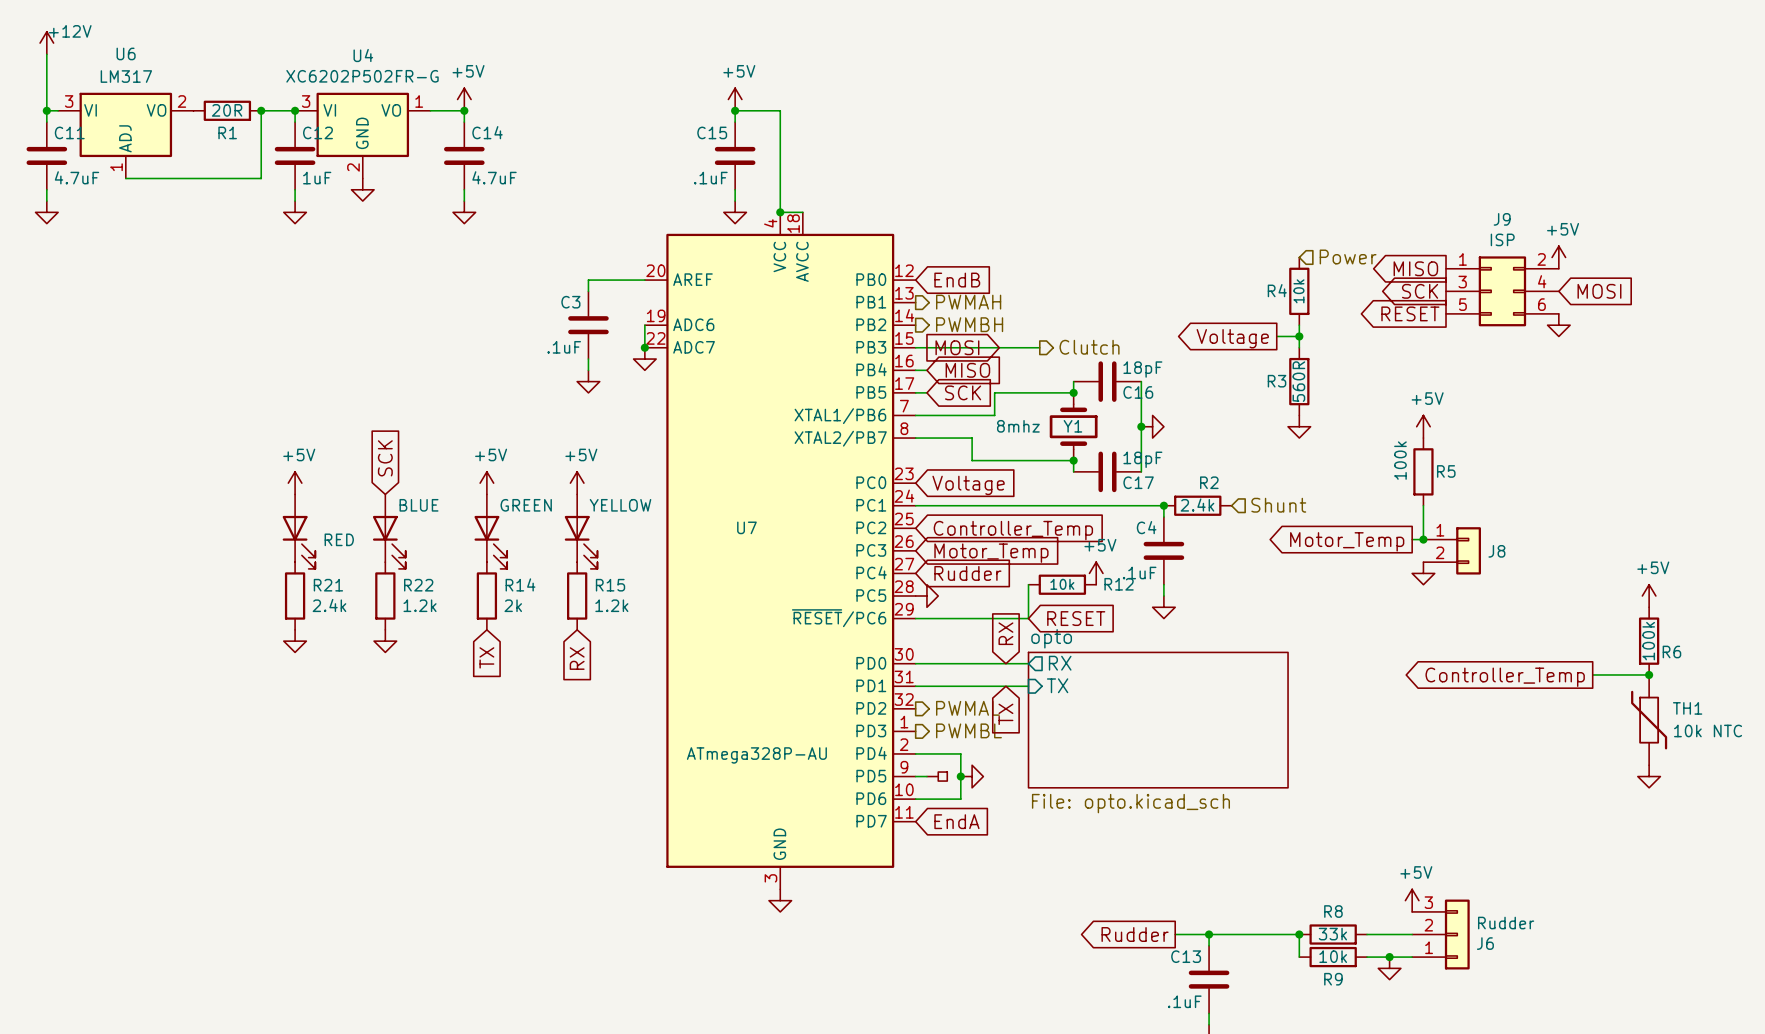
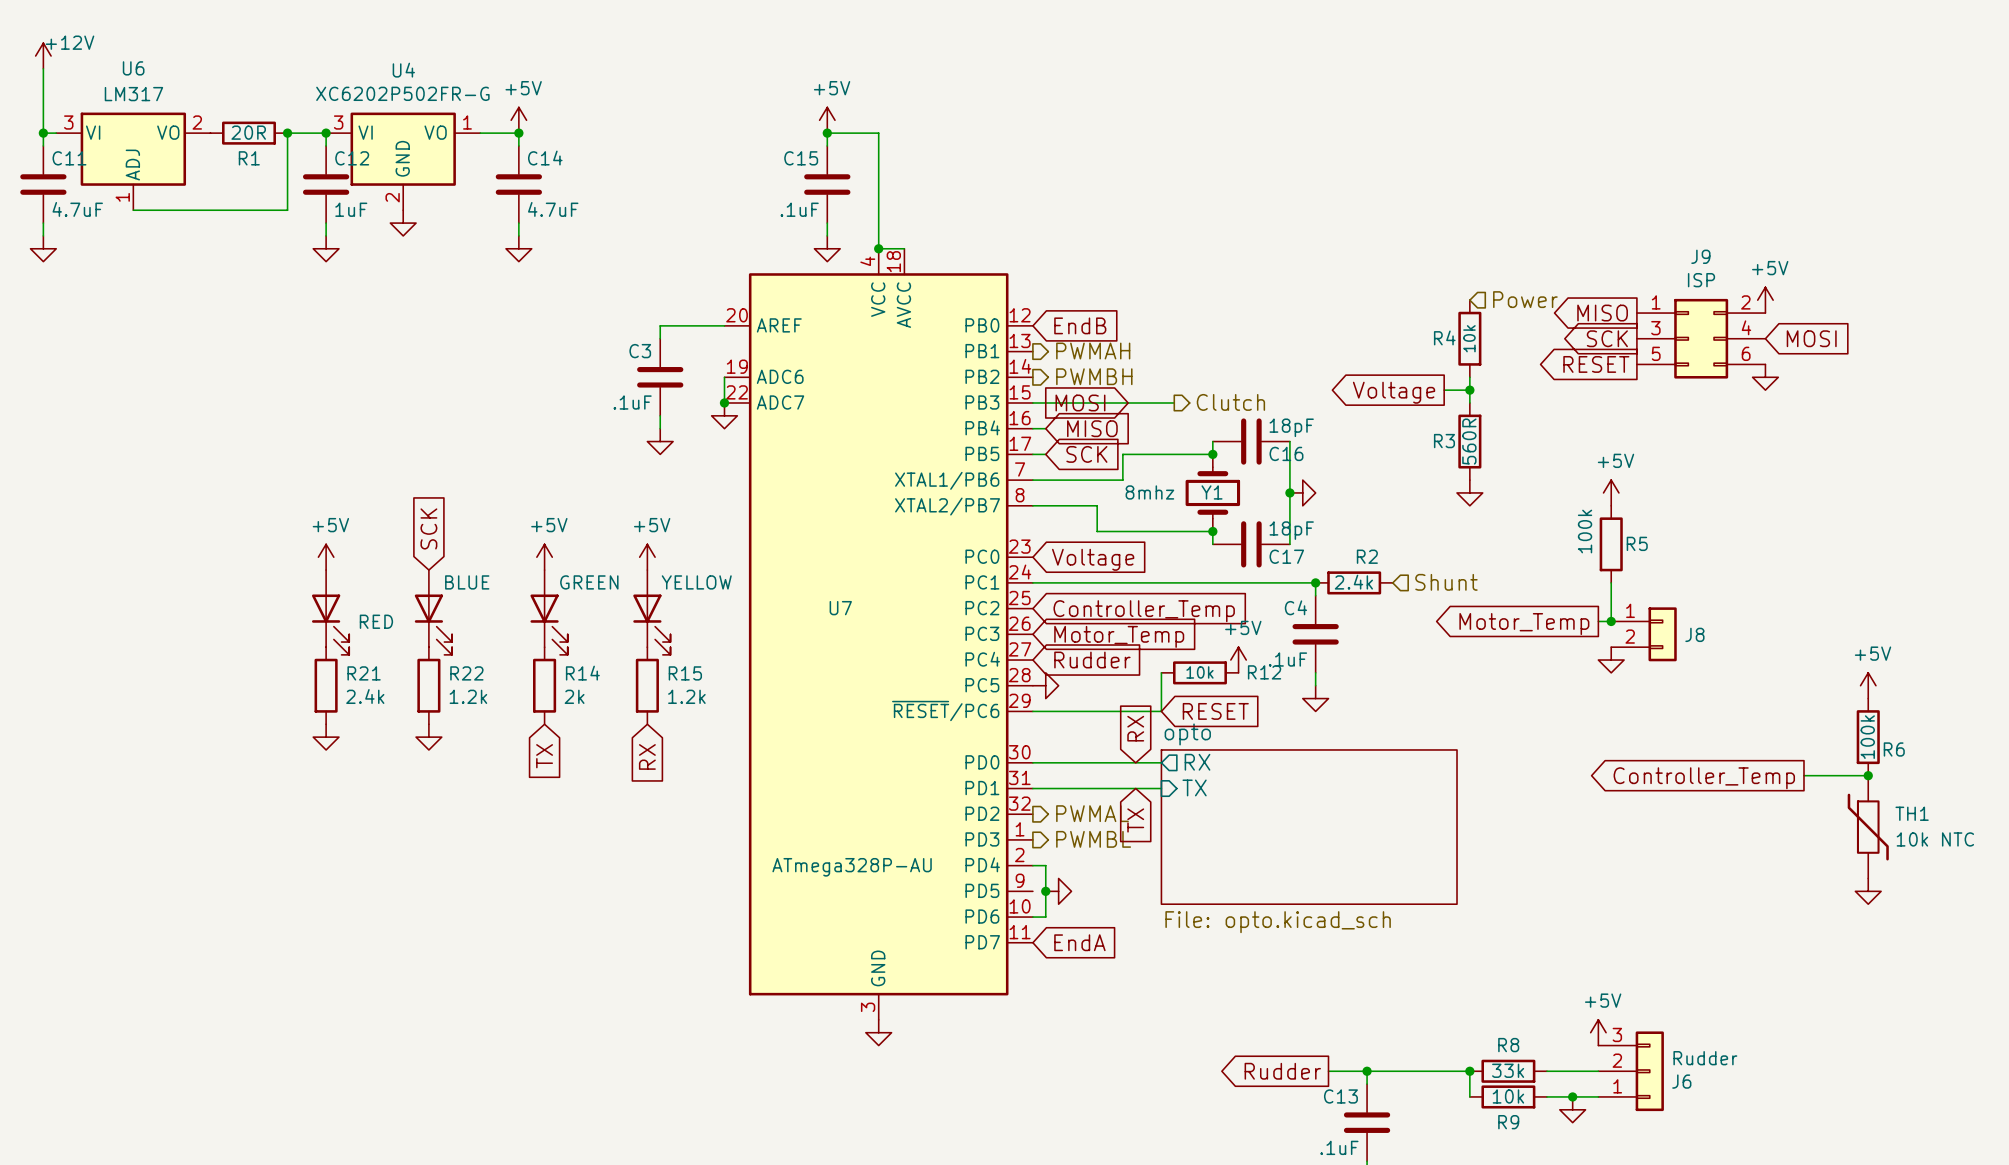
wire: (926, 753) (960, 753) (960, 799) (926, 799) -> (1045, 865) (1045, 917)
wire: (915, 776) (926, 776) -> none
part: (937, 776) -> none
junction position: (960, 776) -> (1045, 891)
power symbol position: (972, 776) -> (1058, 891)

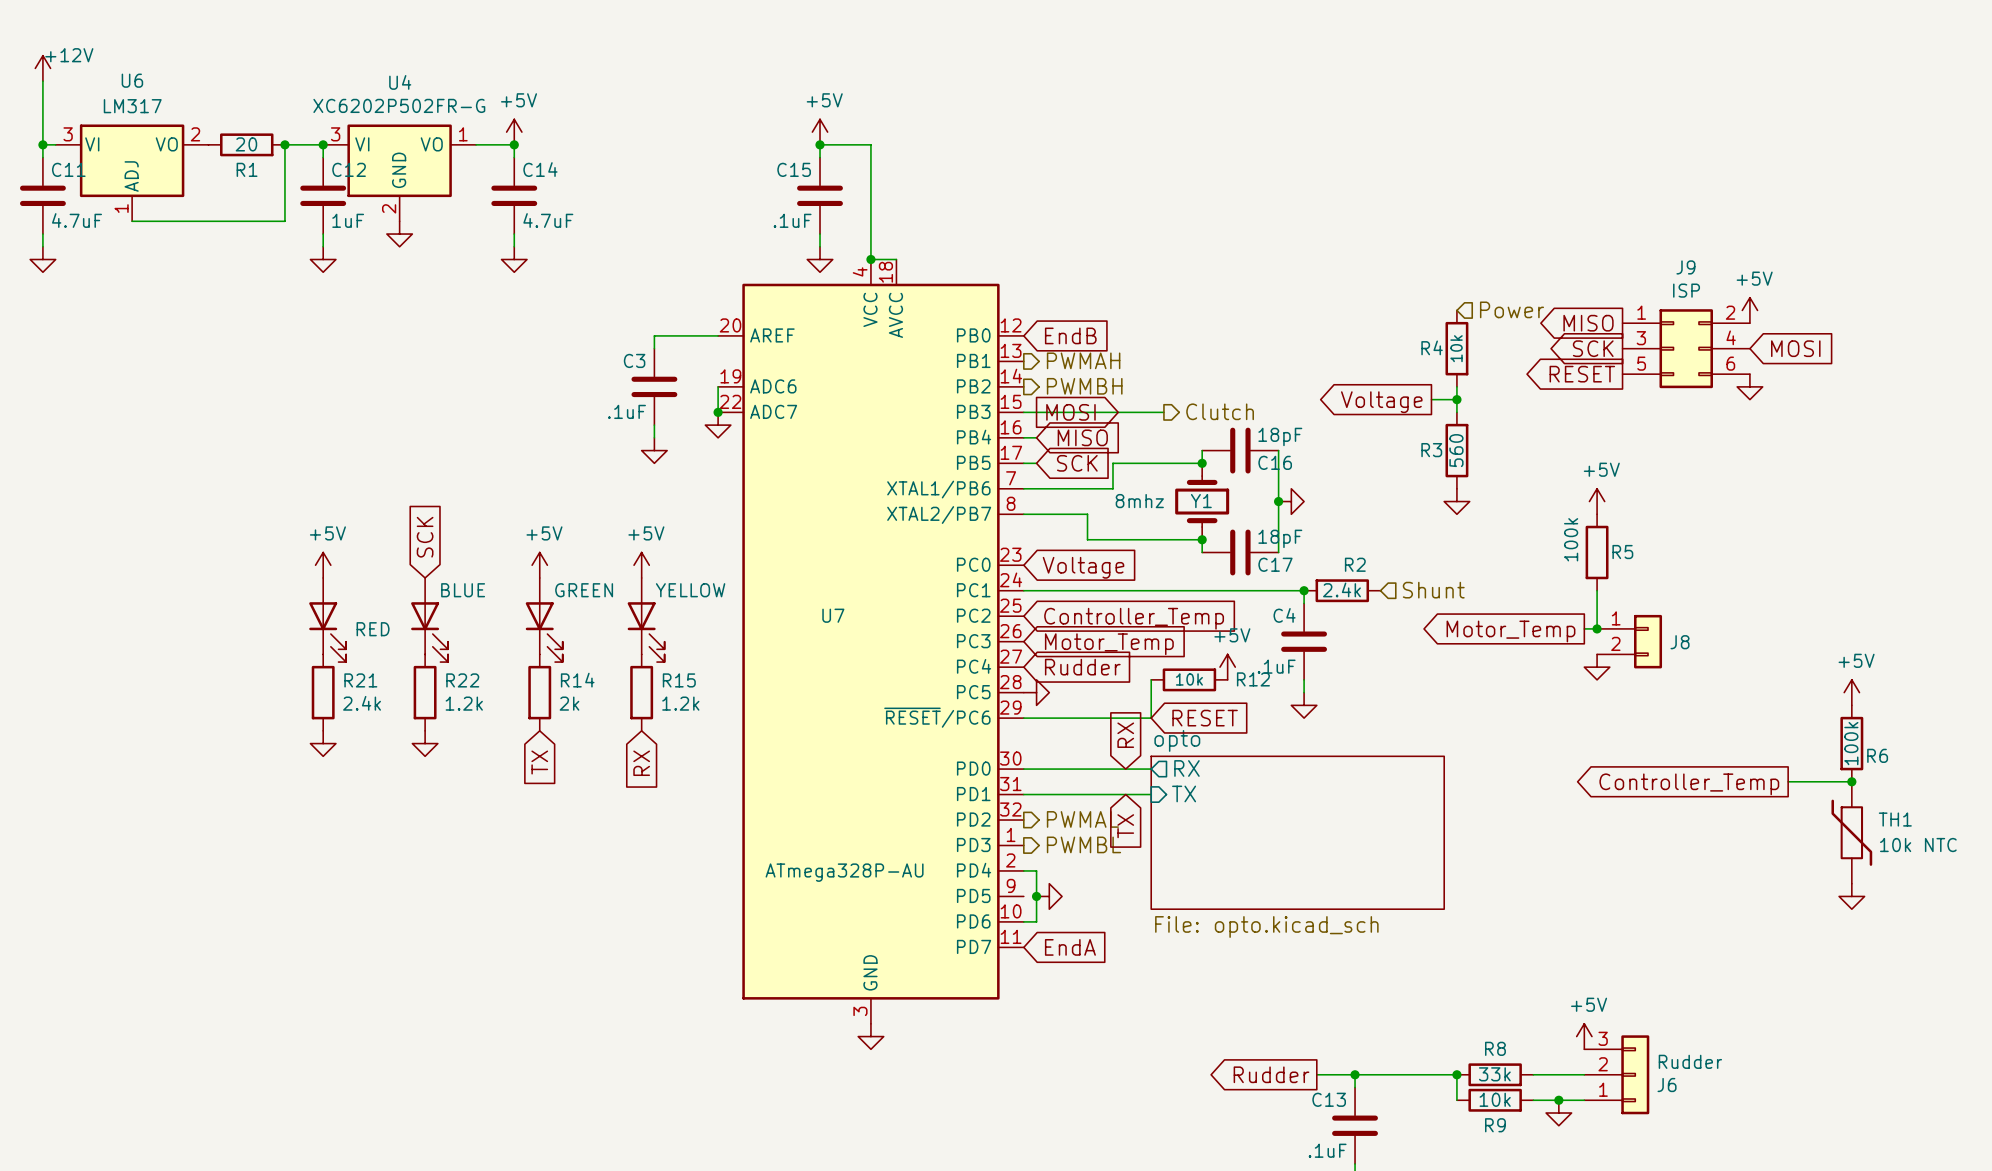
R1 value: 20R (248, 132) -> 20 (246, 144)
R3 value: 560R (1469, 441) -> 560 (1456, 450)

